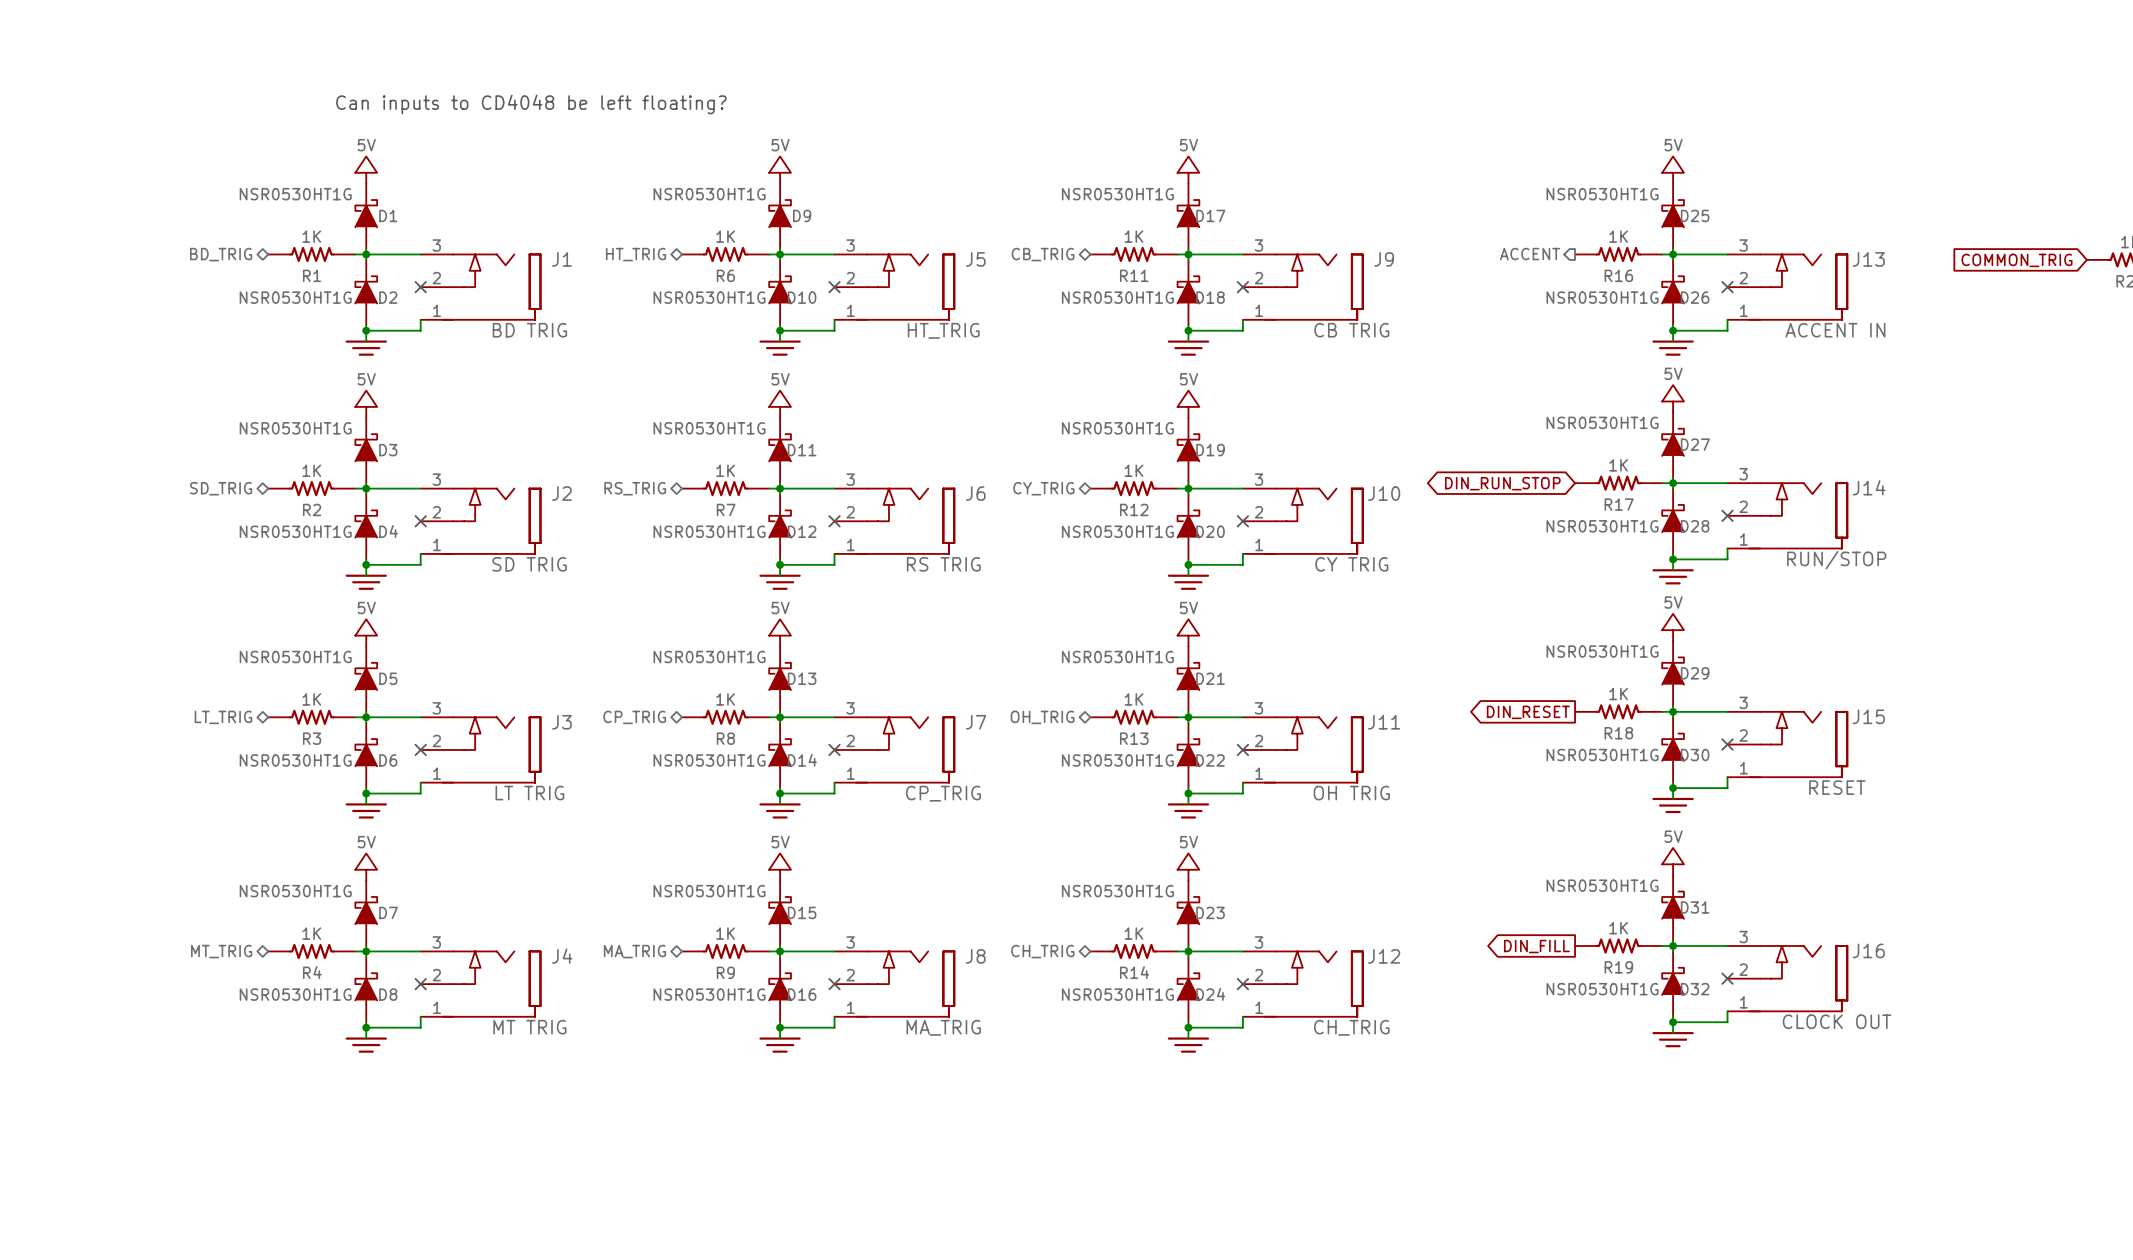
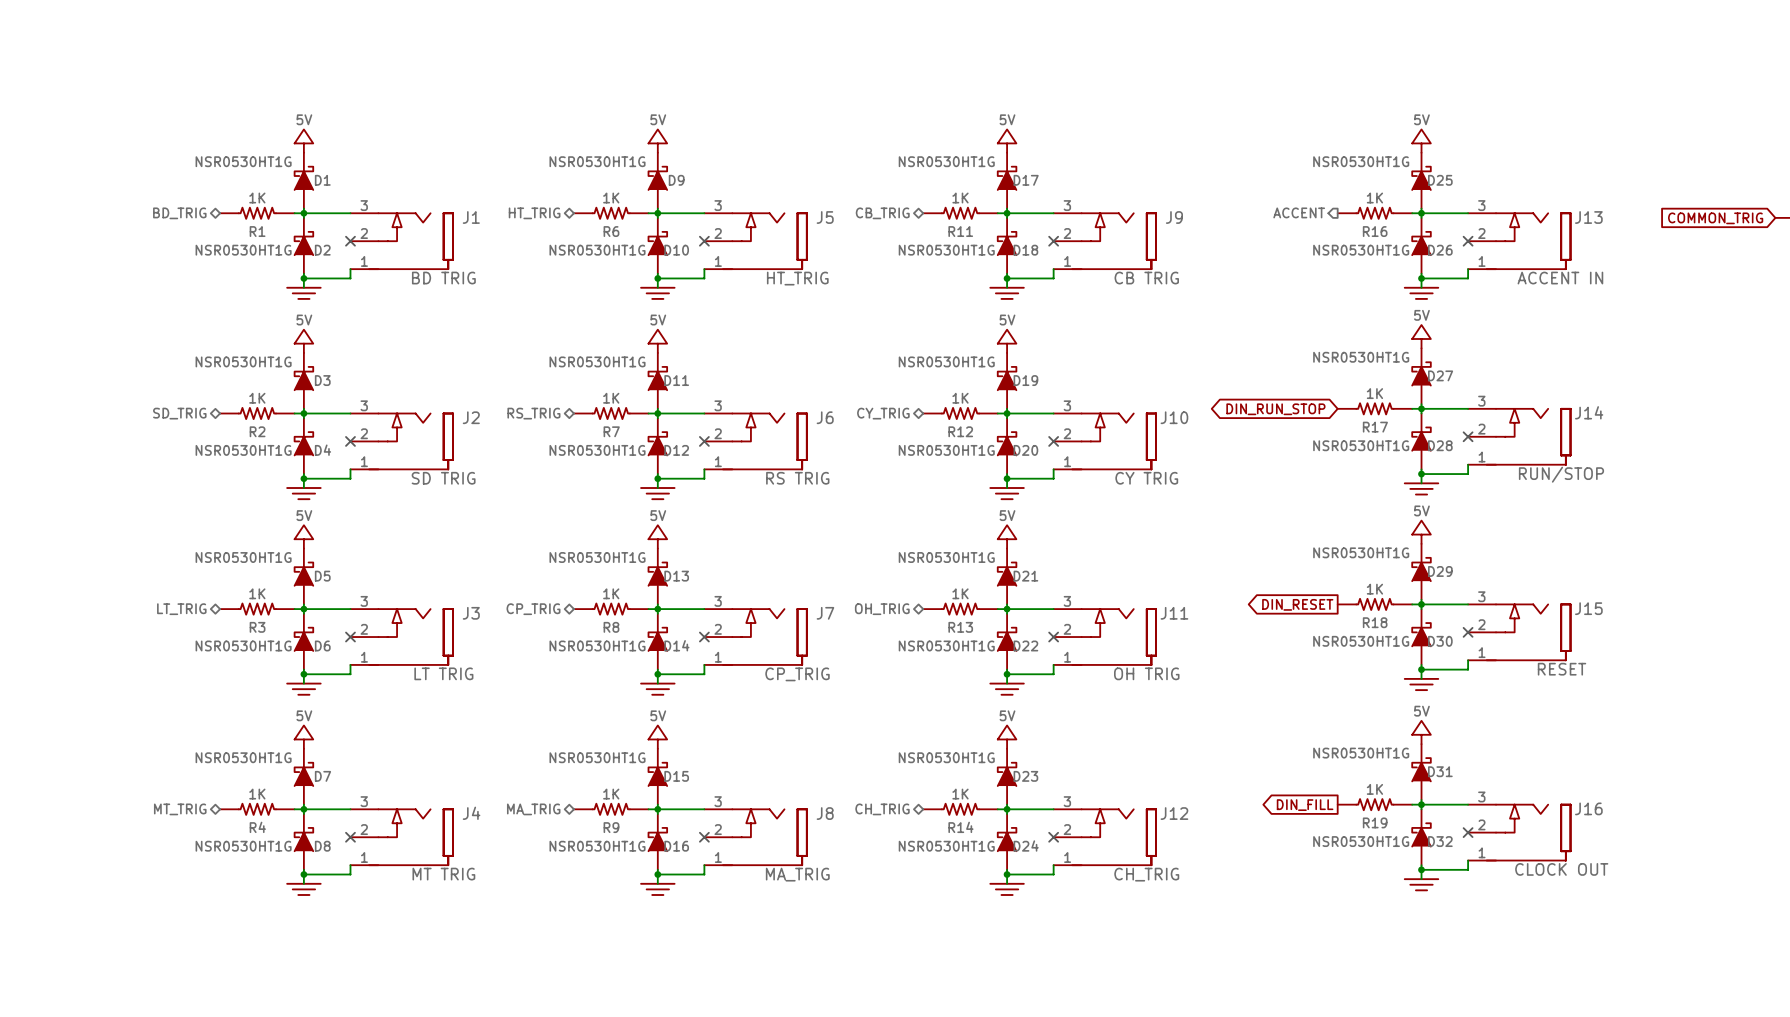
text: Can inputs to CD4048 be left floating? (531, 104) -> none

